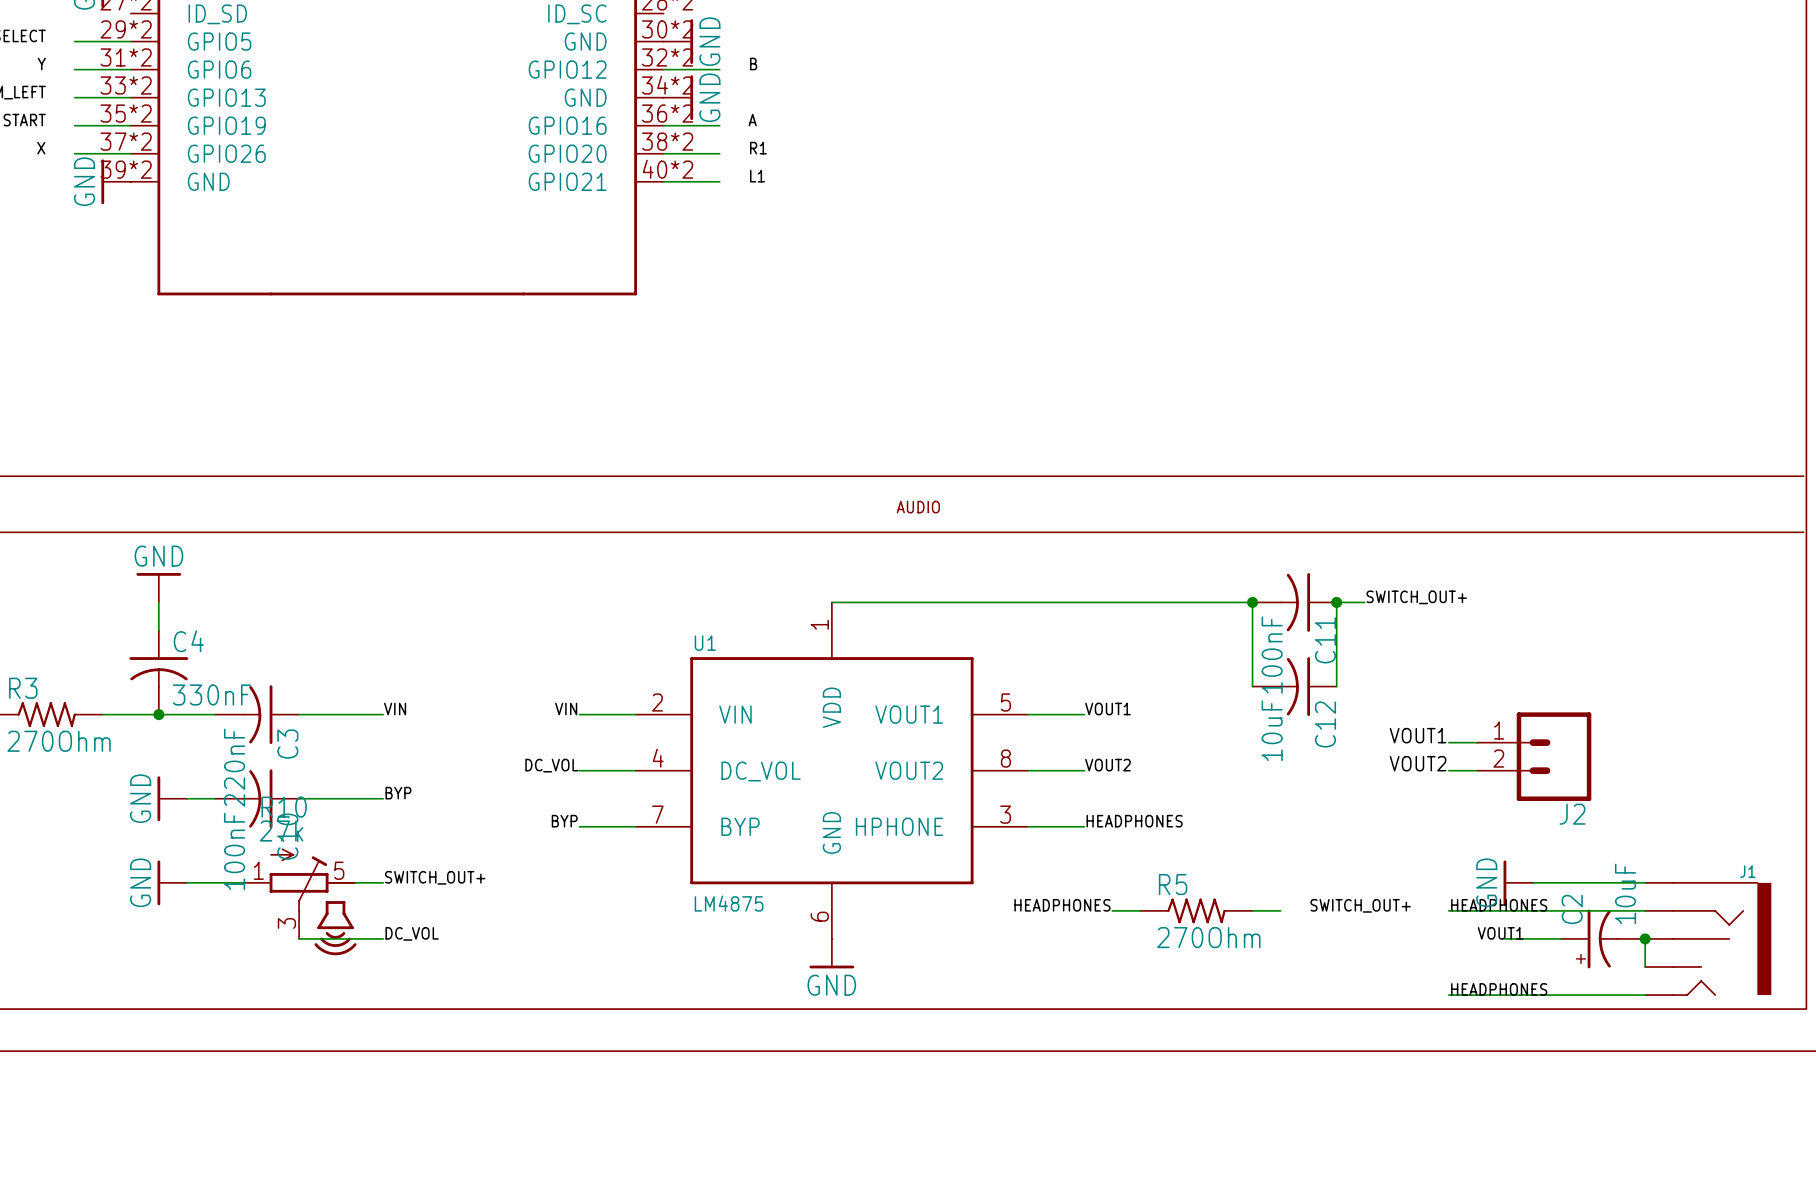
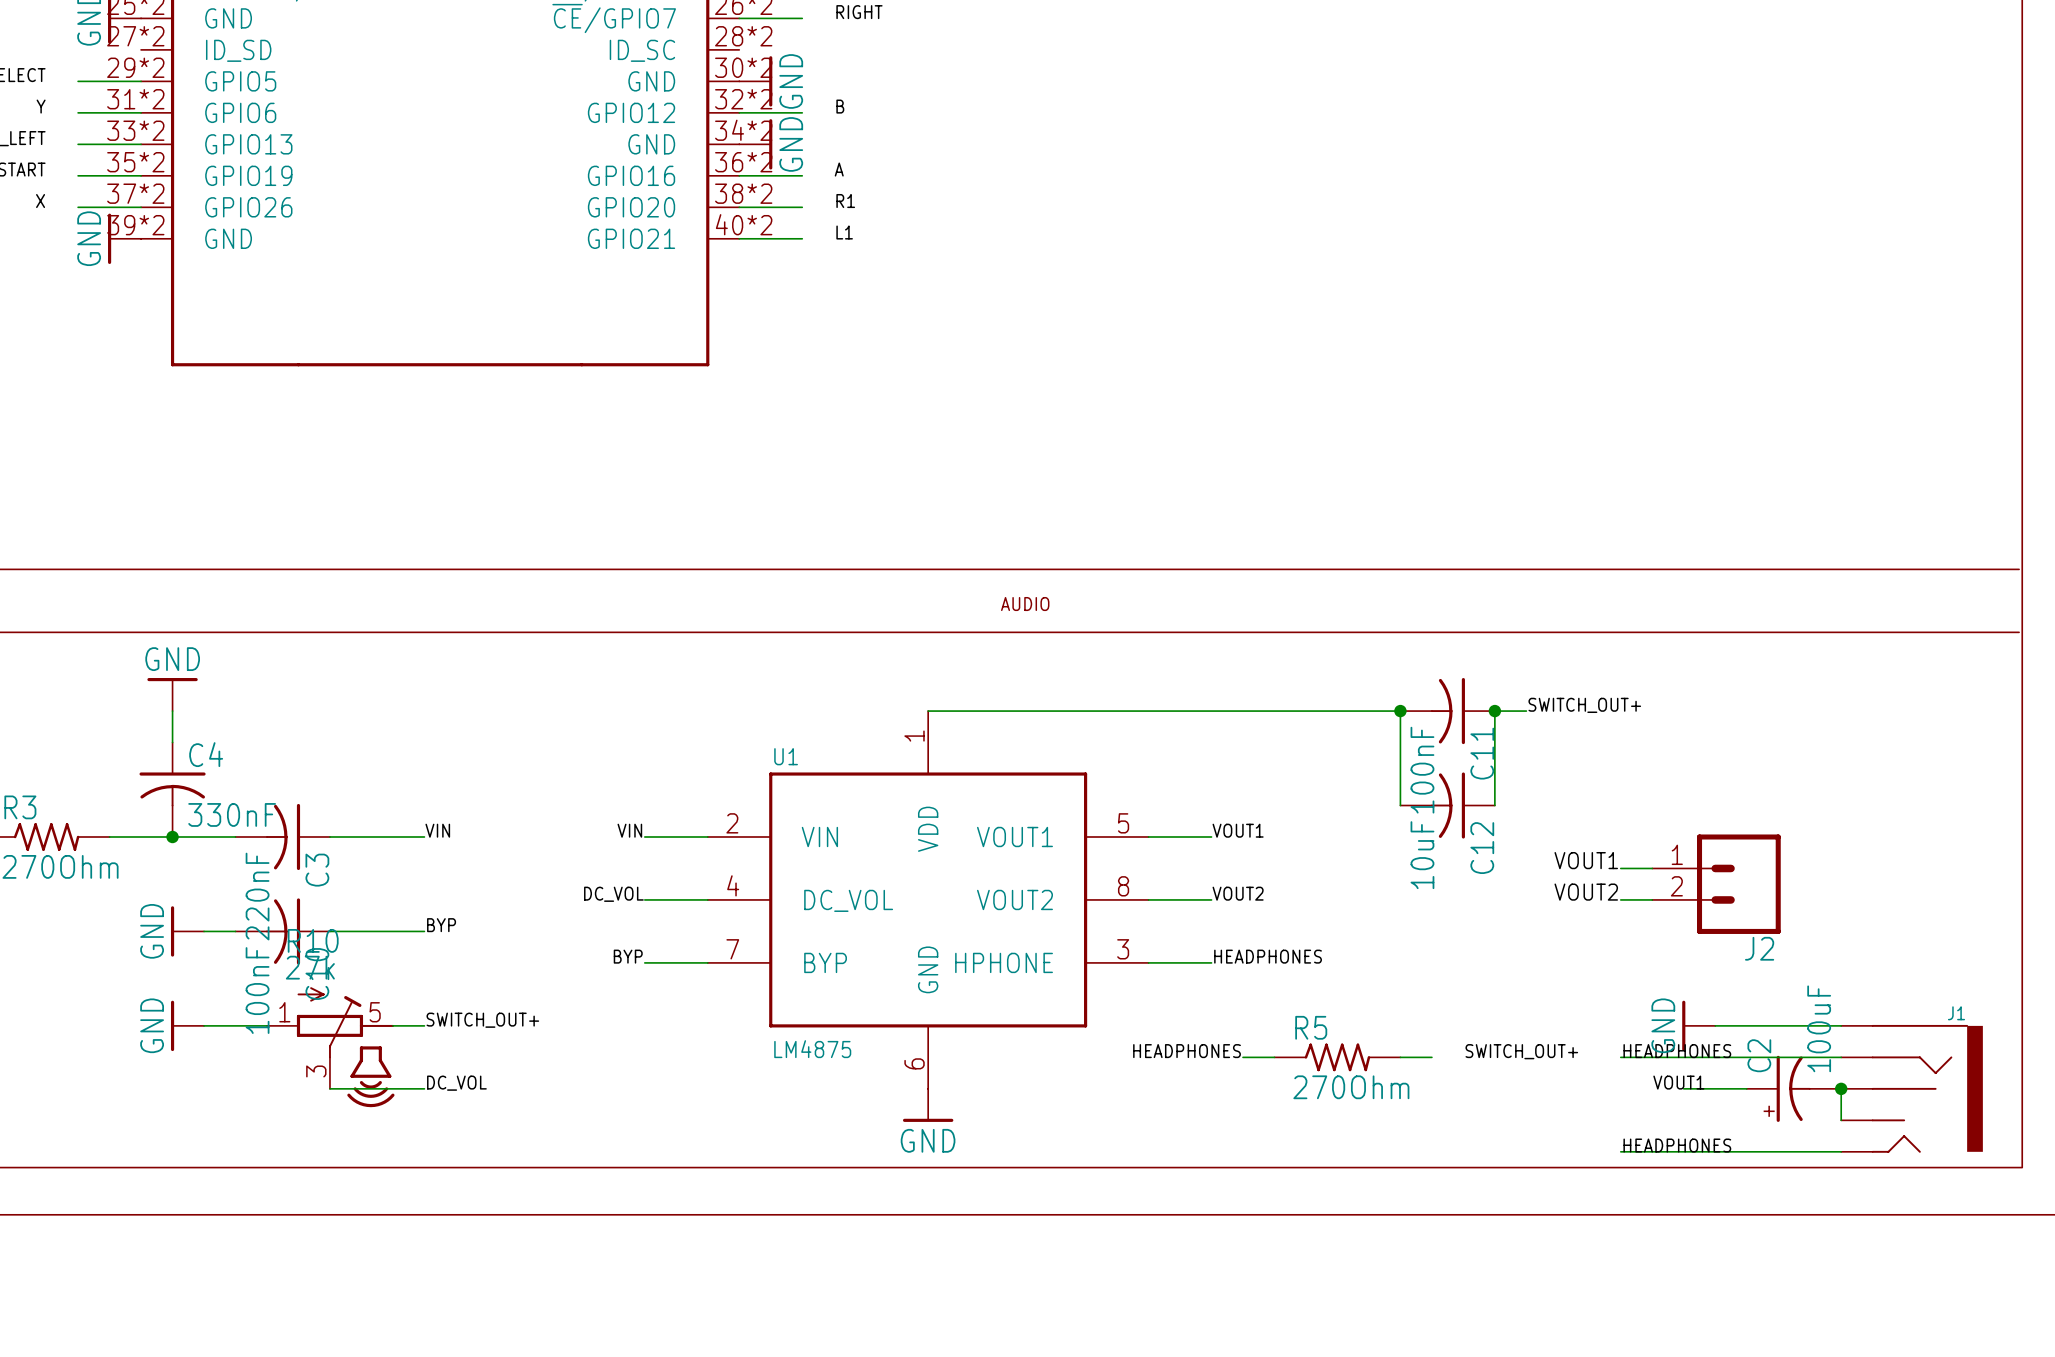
C2 value: 10uF (1625, 893) -> 100uF (1819, 1028)

